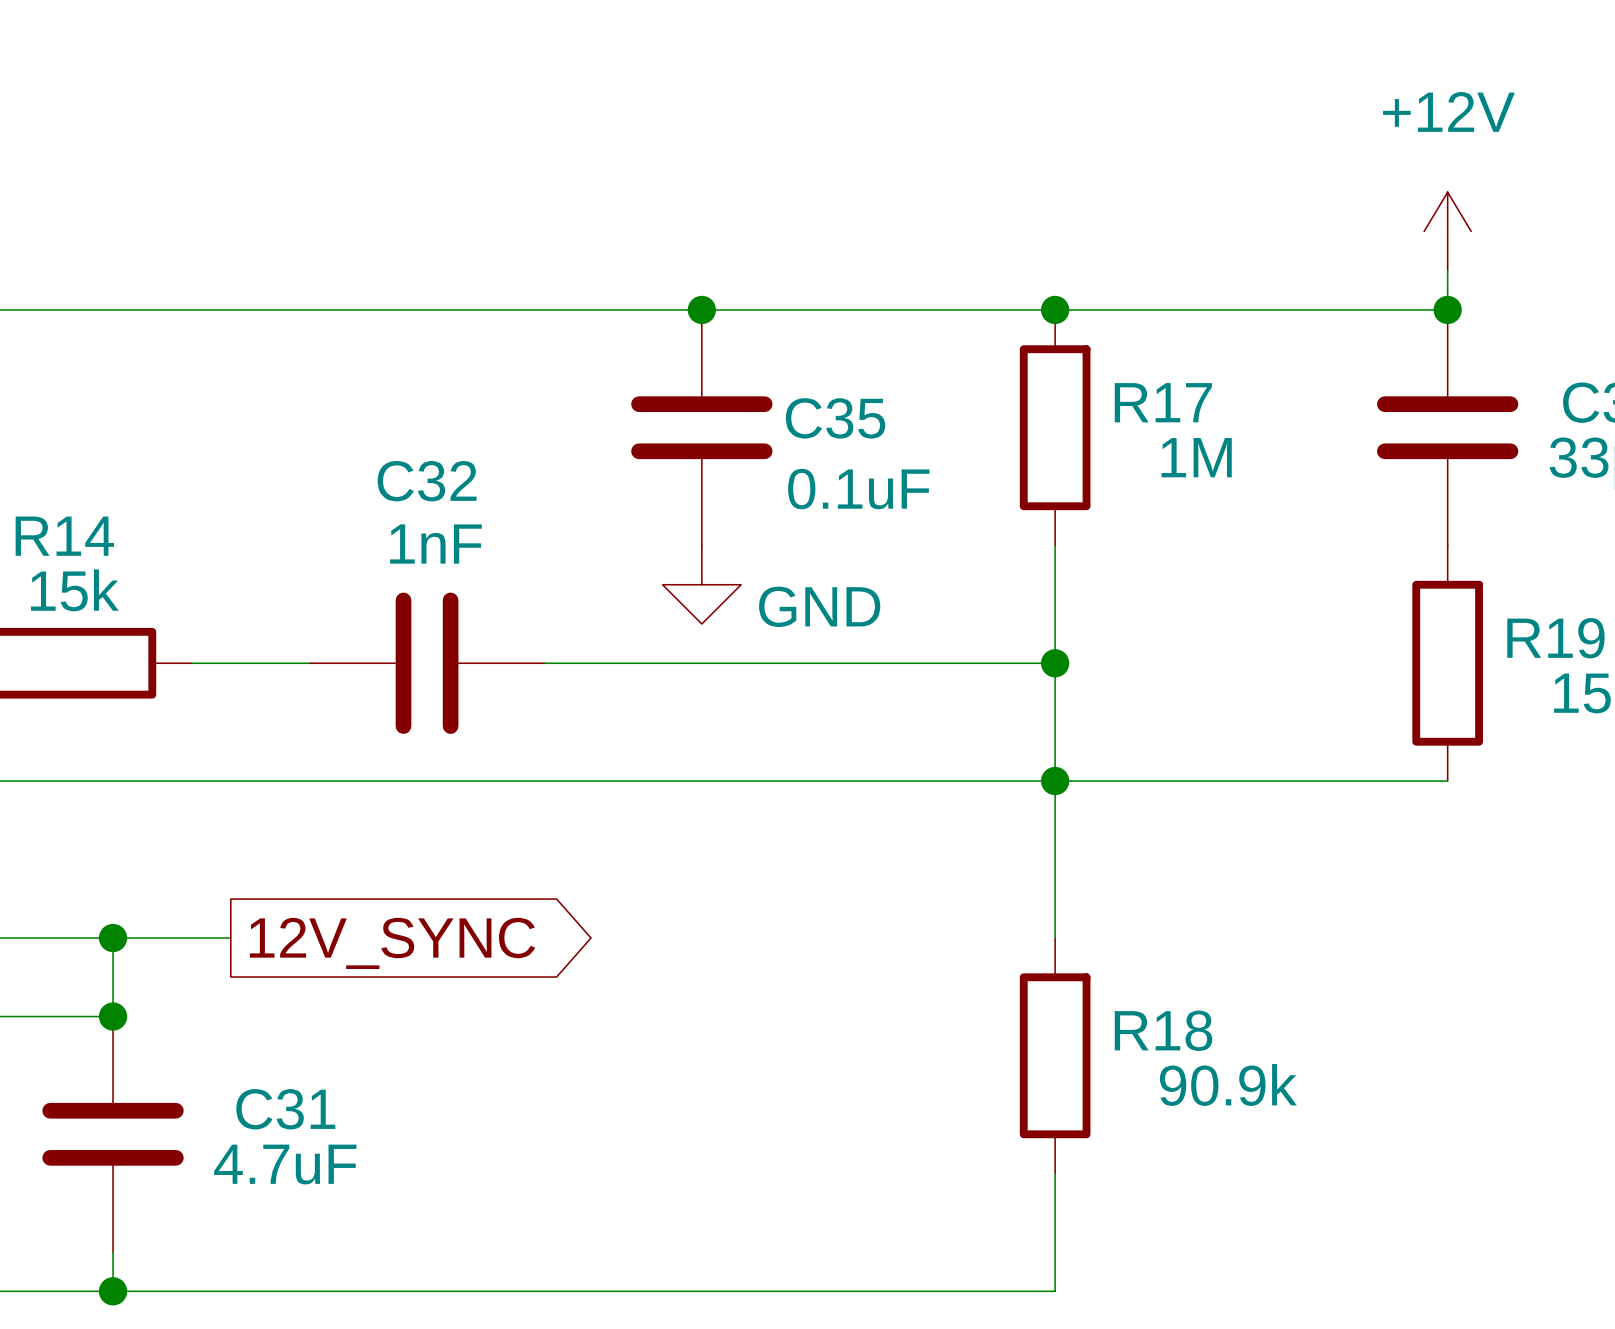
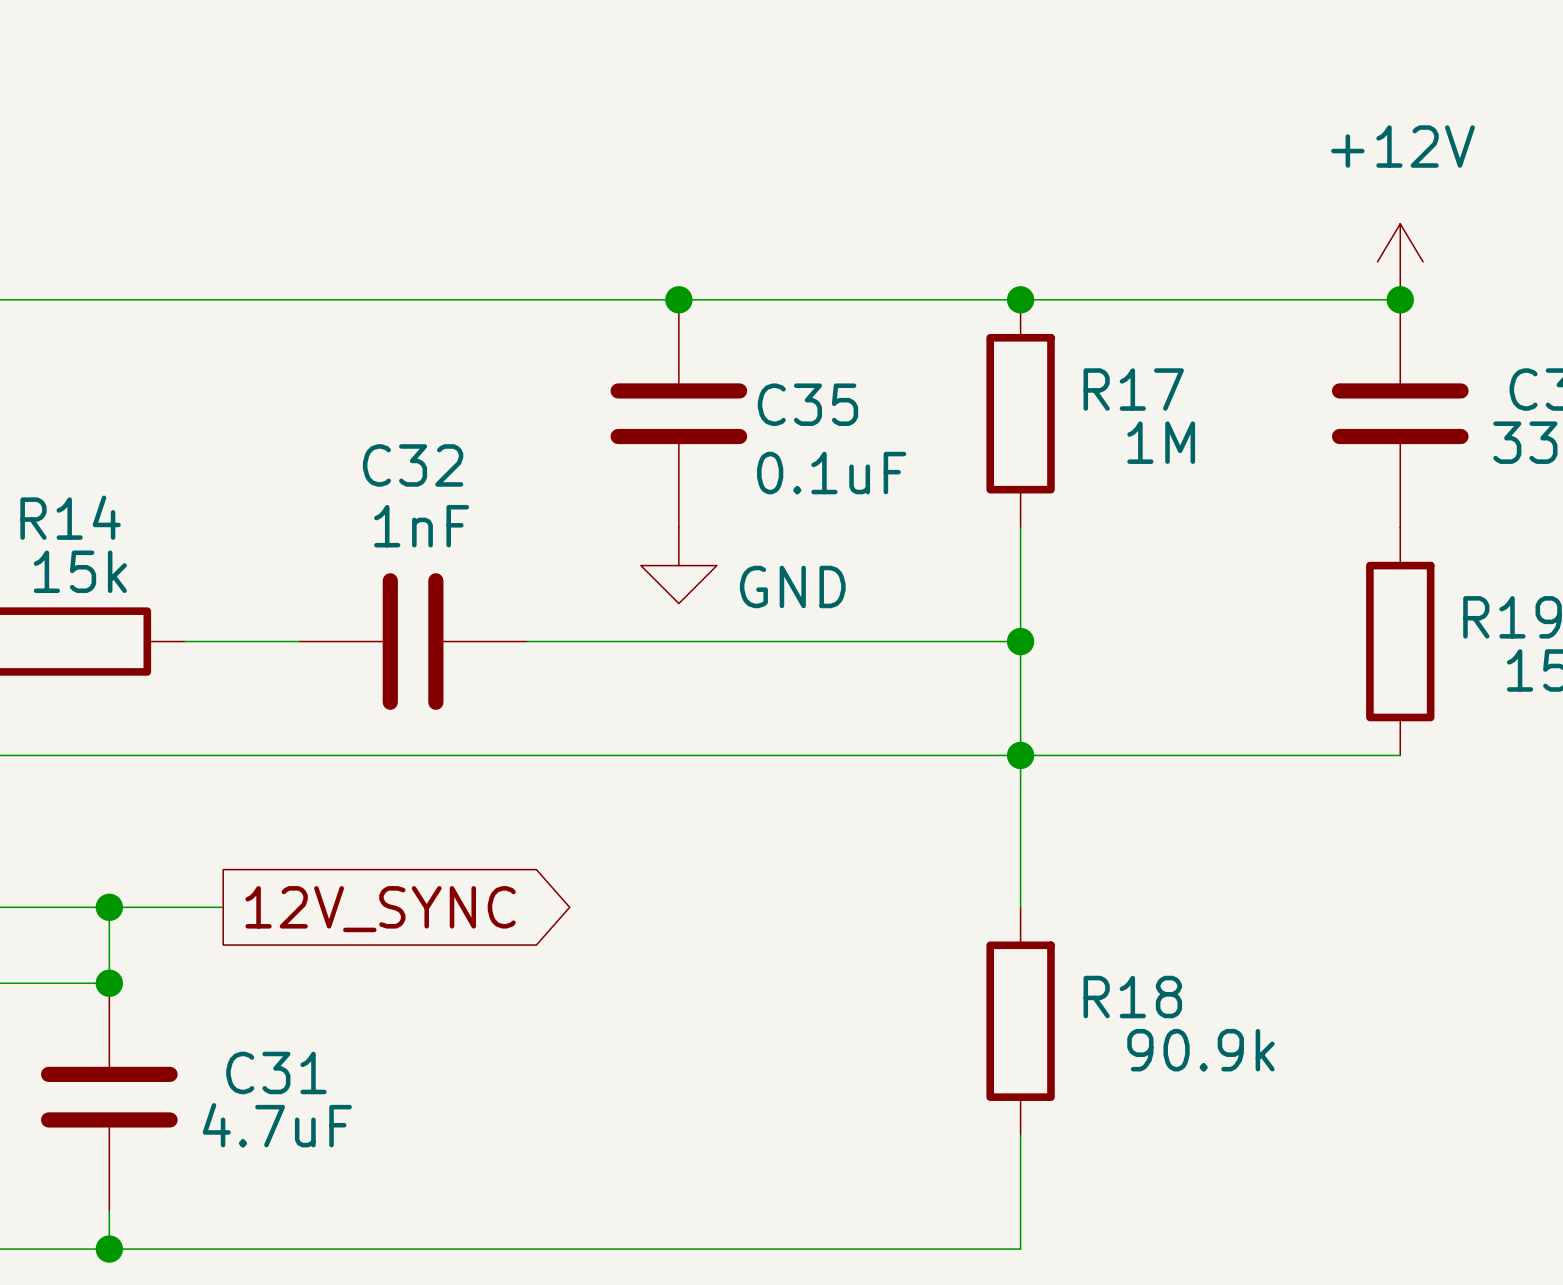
power symbol position: +12V (1447, 231) -> +12V (1400, 261)

